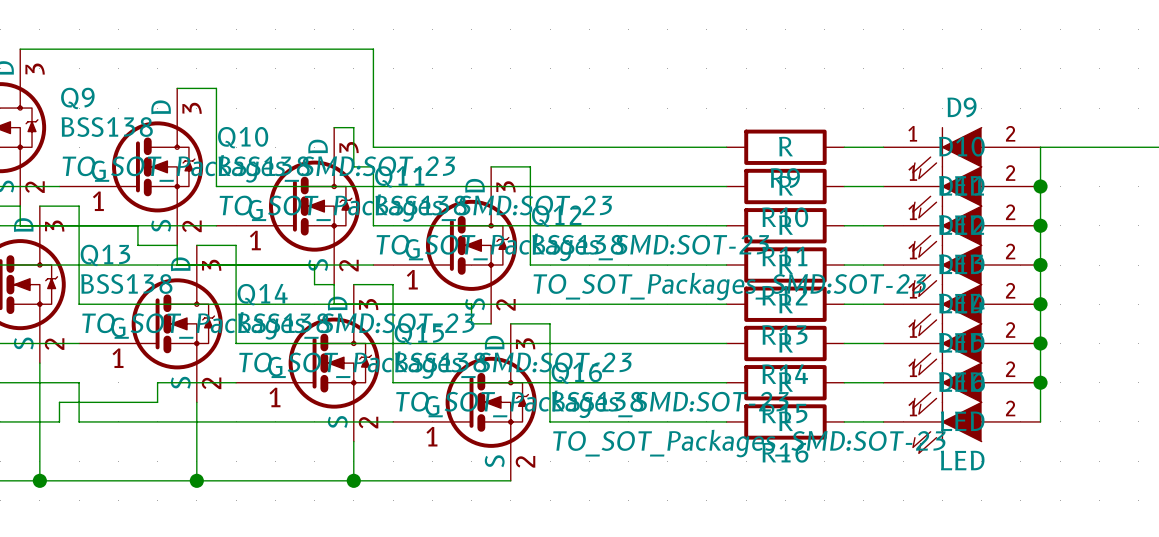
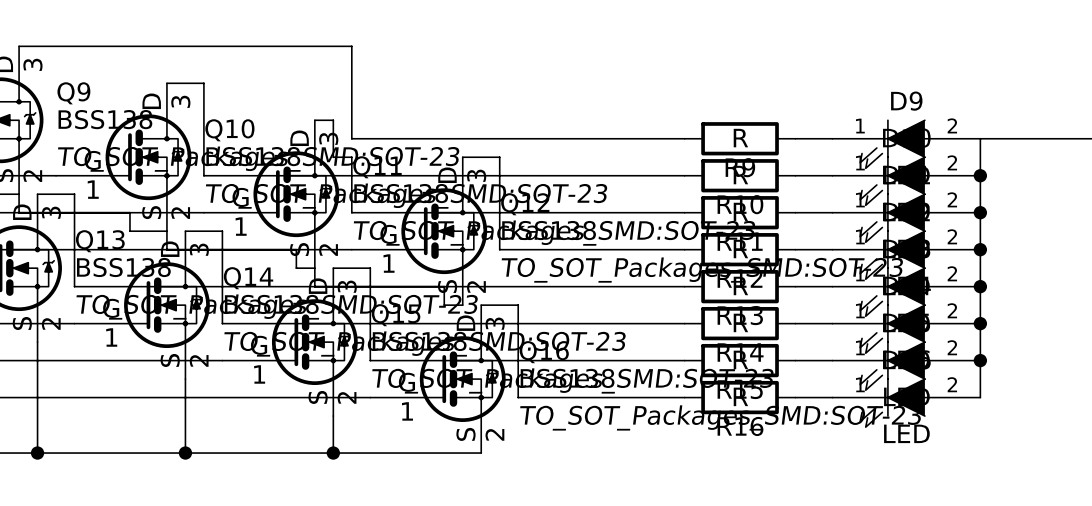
wire: (79, 382) (79, 421) -> (56, 397) (74, 397)
wire: (157, 382) (157, 402) (59, 402) (59, 421) -> (148, 360) (74, 360)

